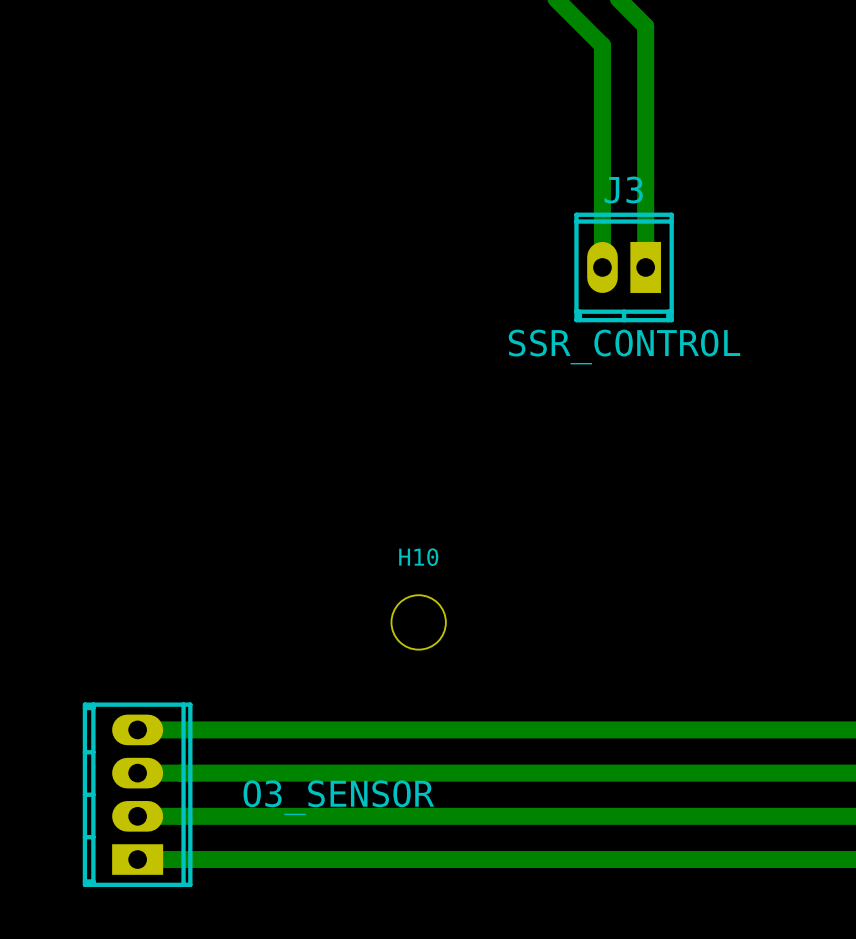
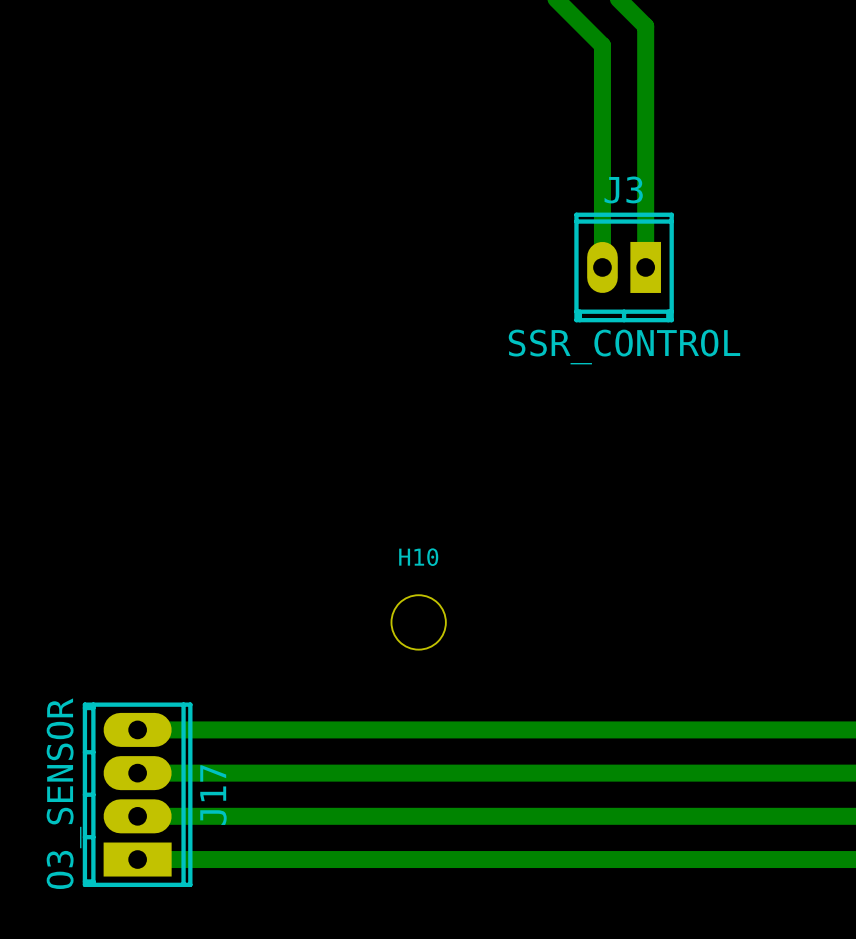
part: O3_SENSOR (137, 794) -> none
J17: none -> O3_SENSOR (137, 794)

